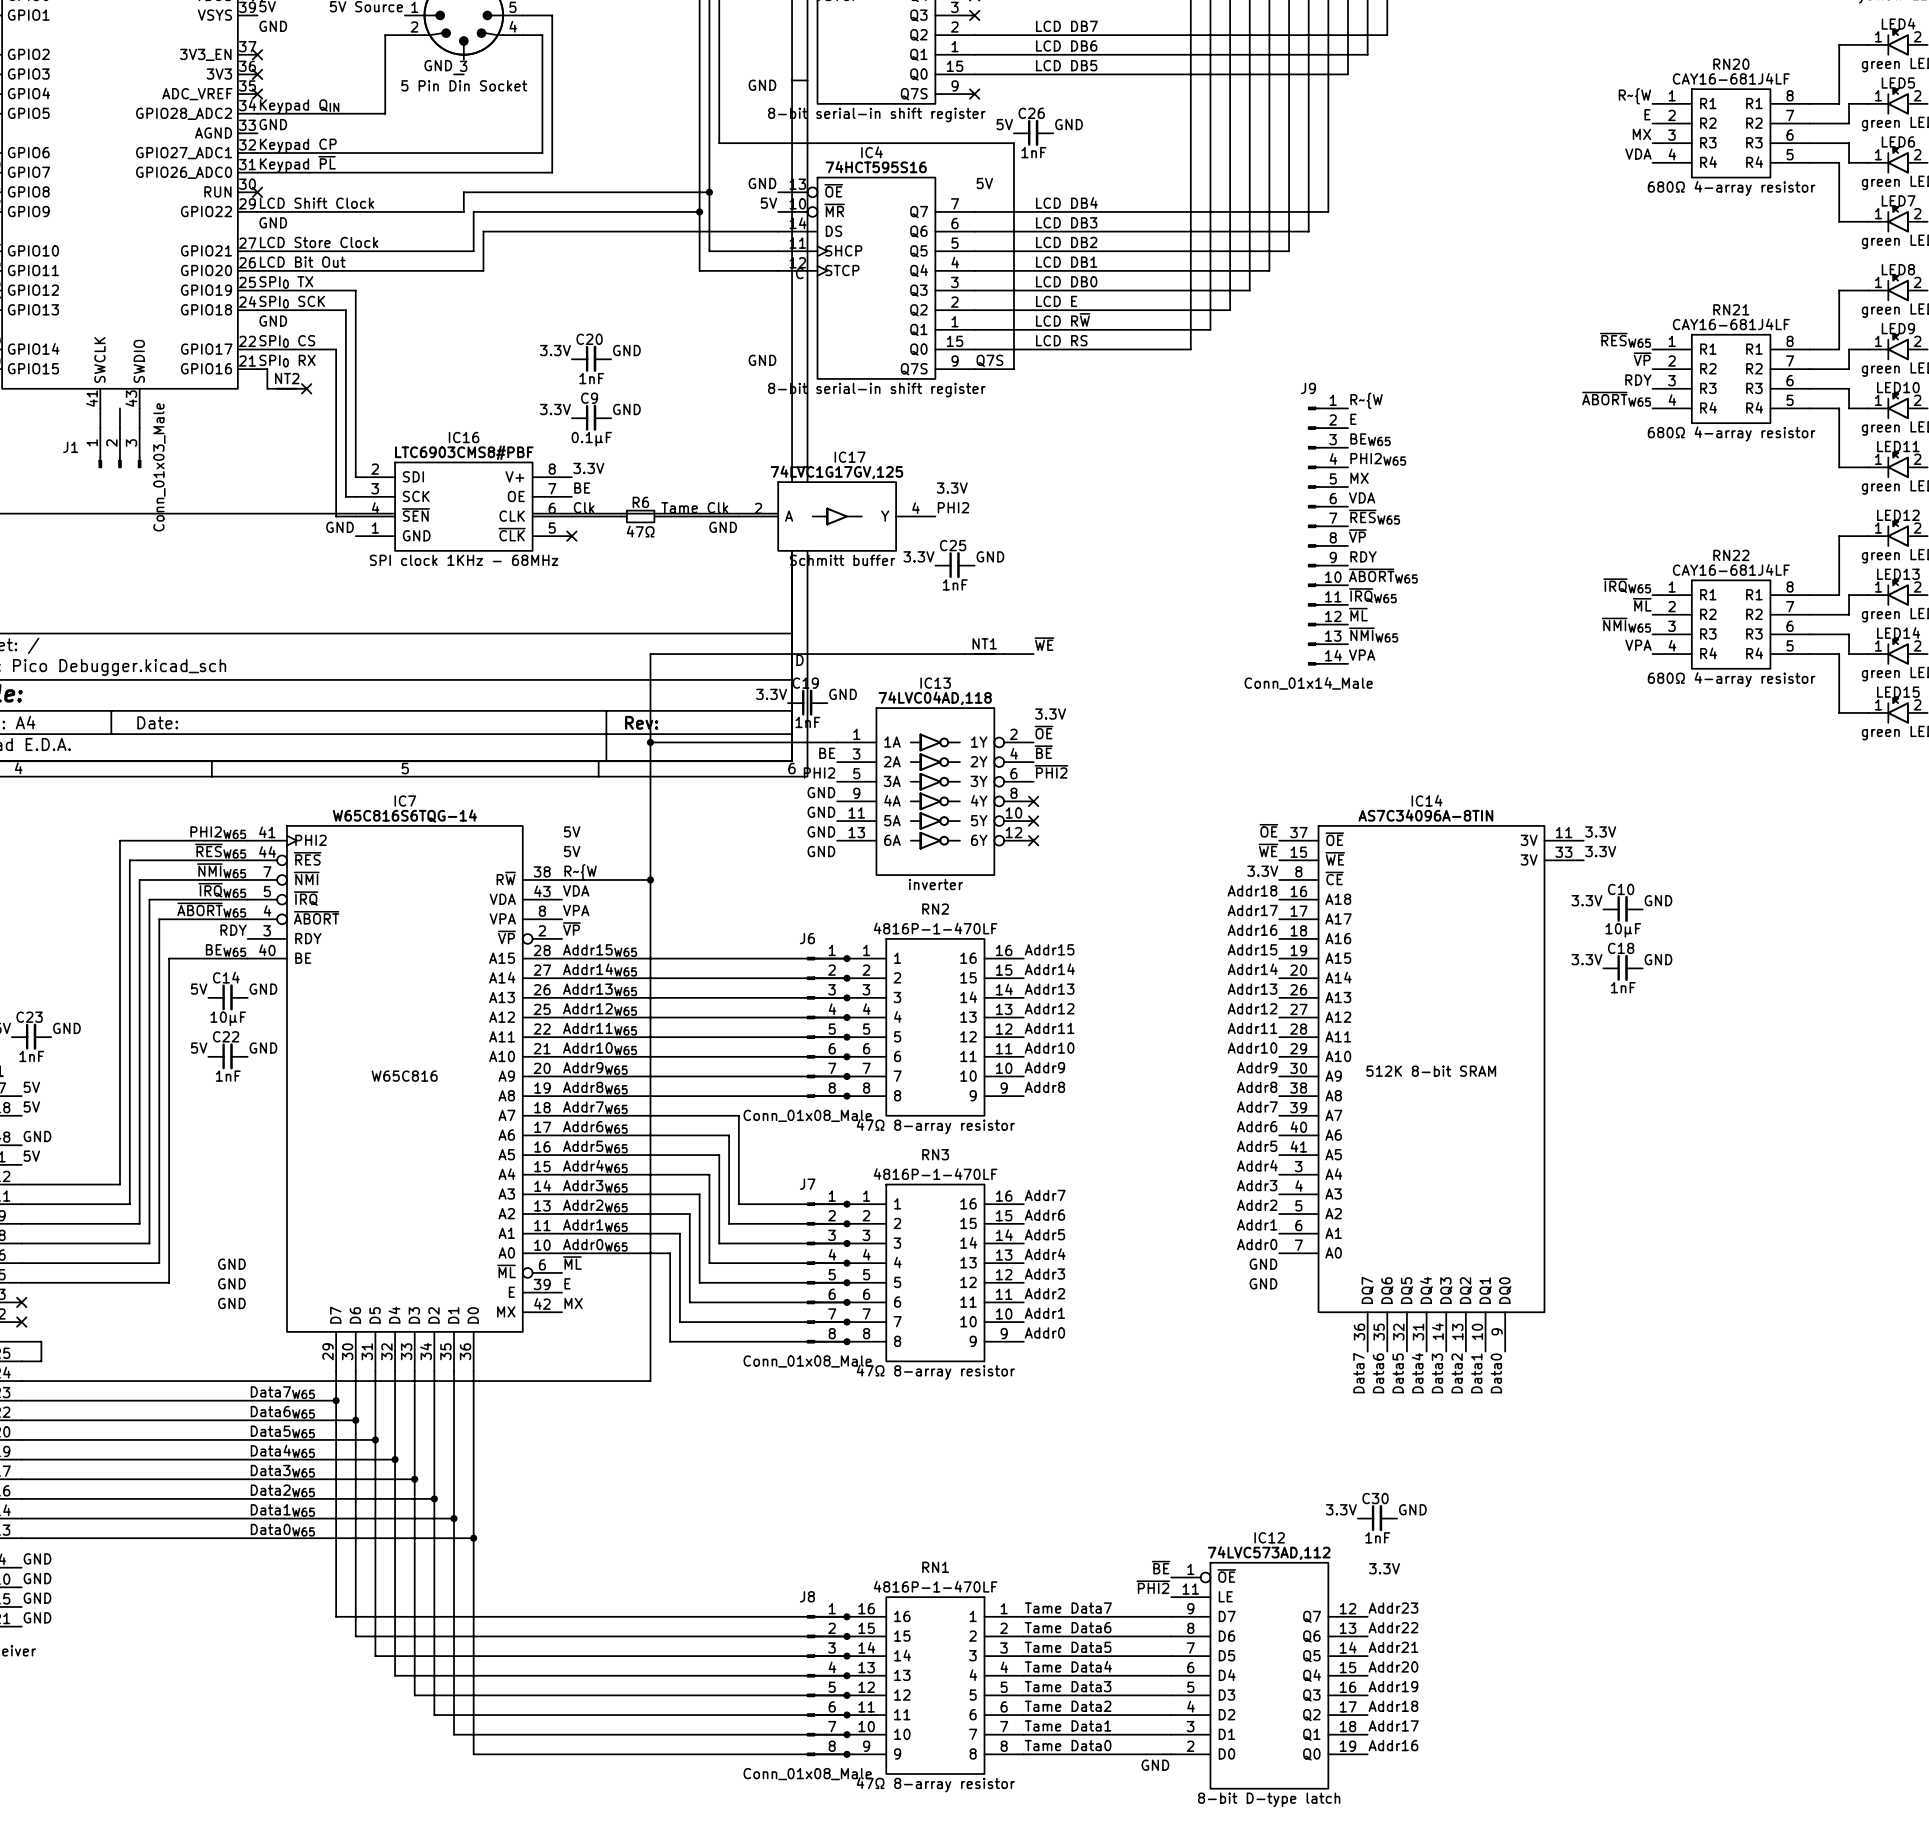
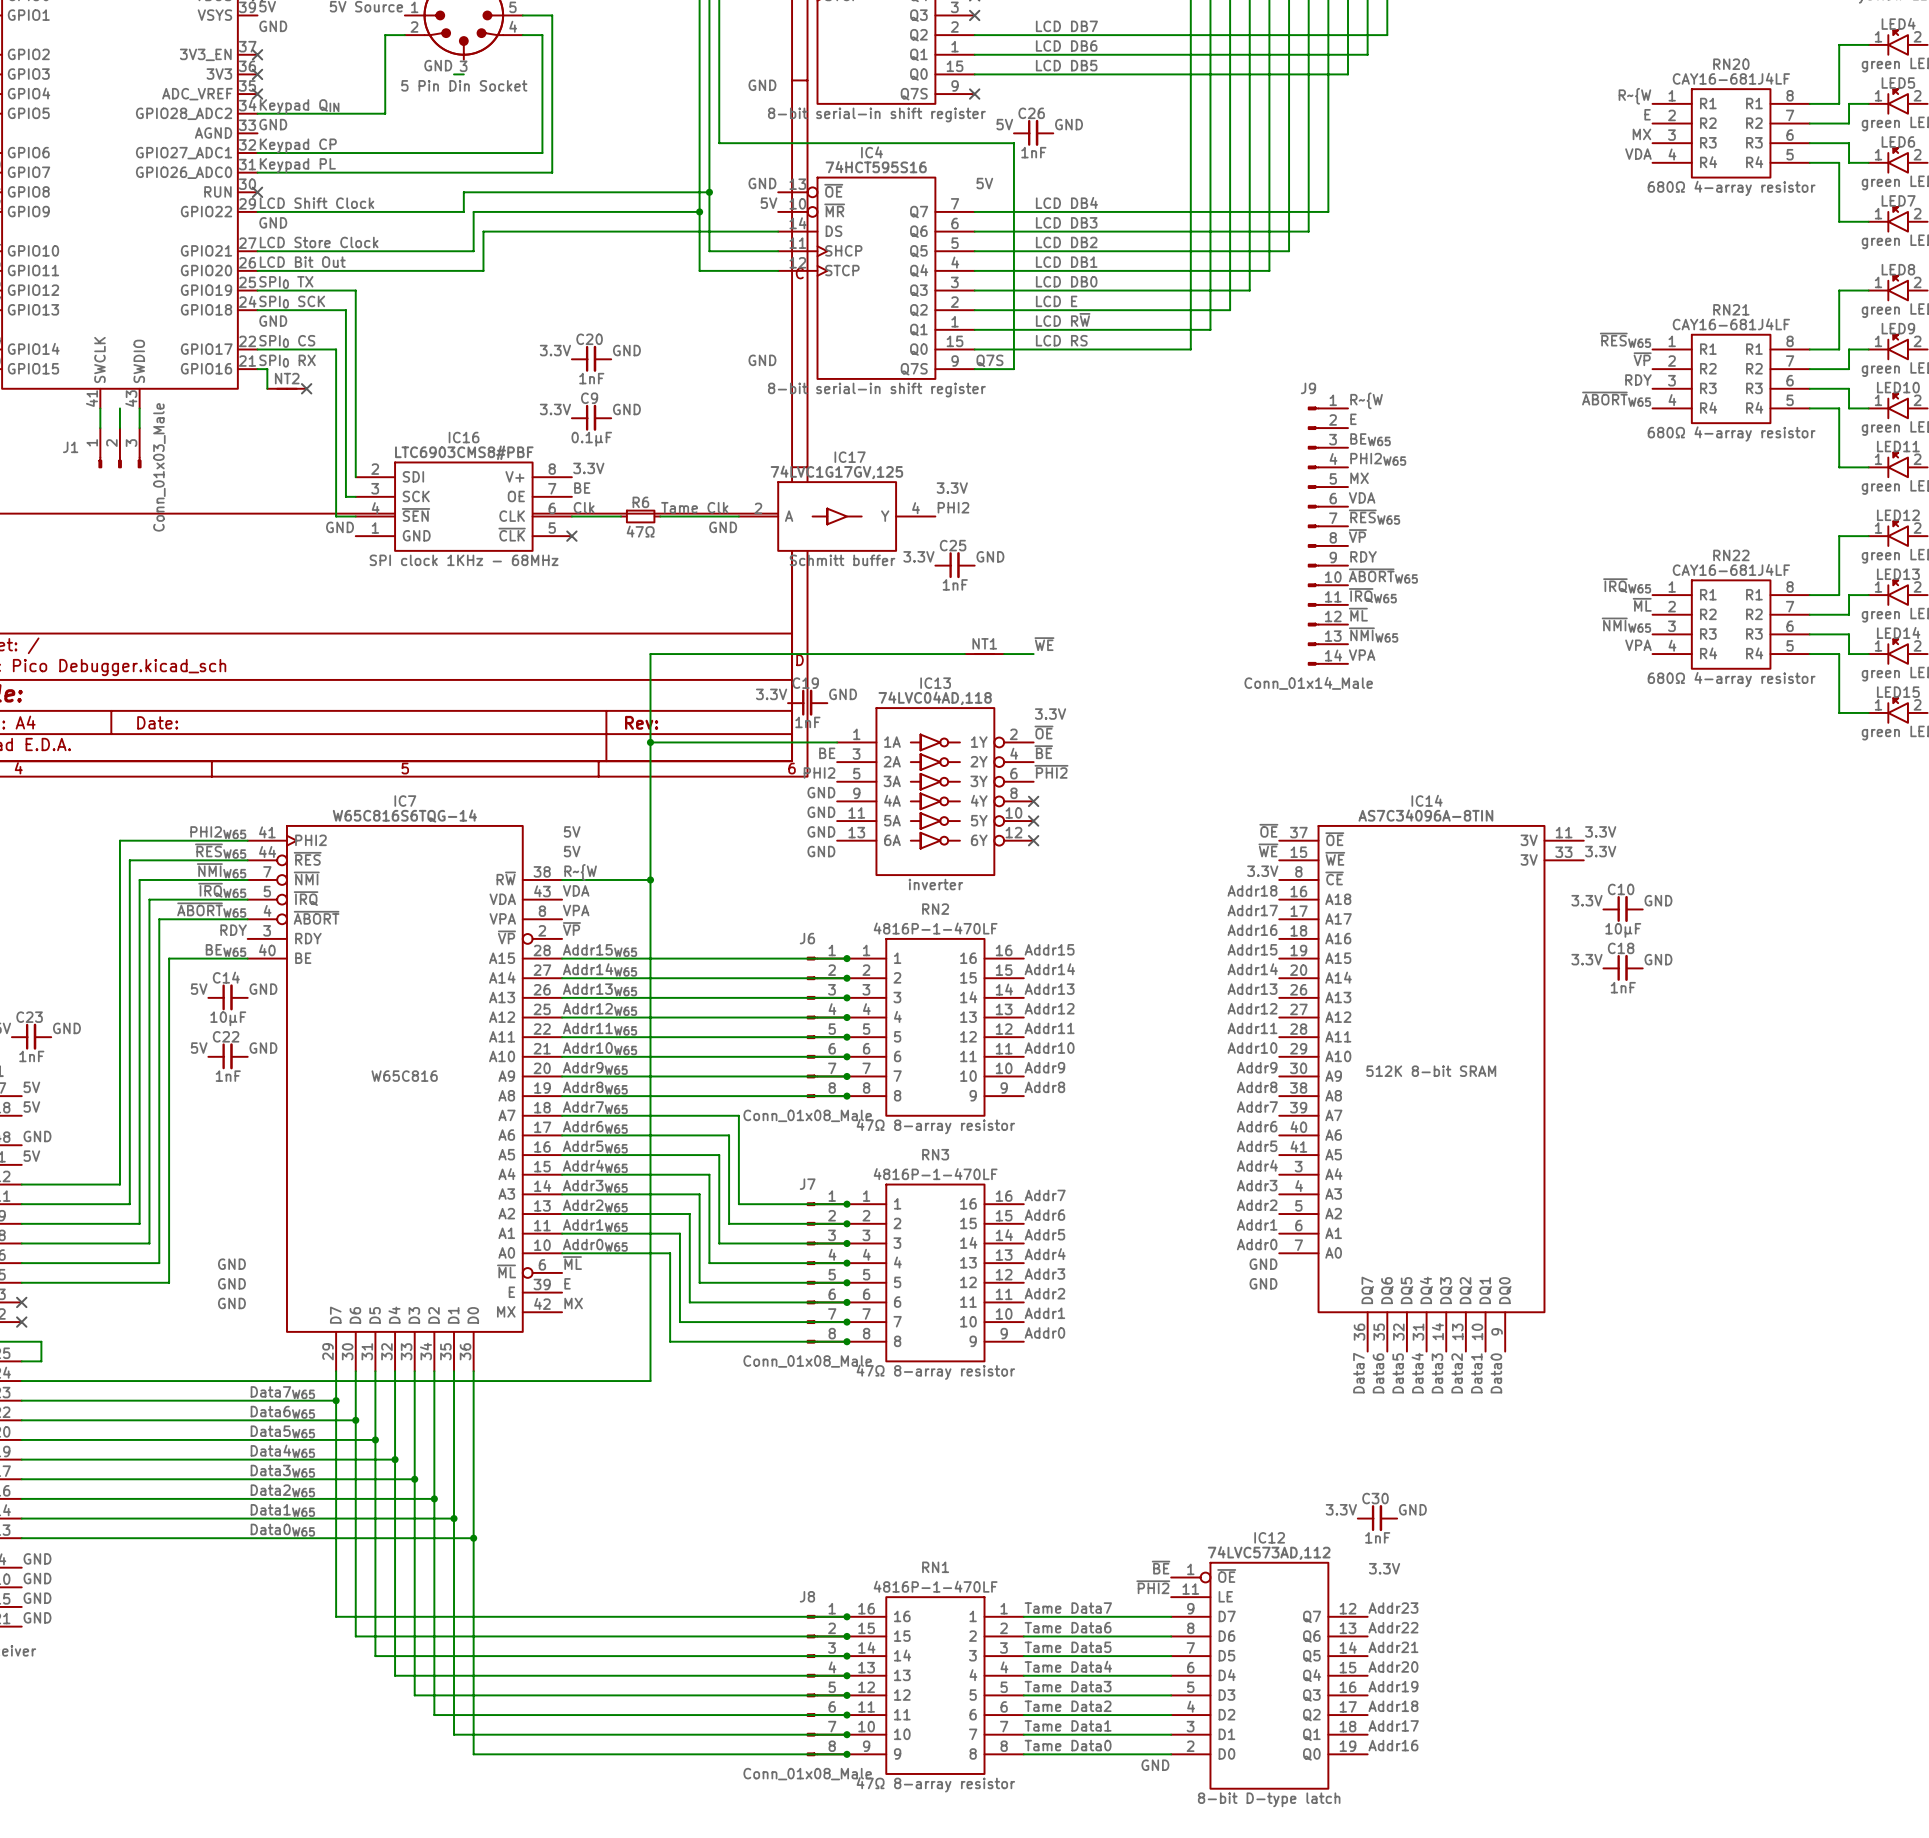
label: Keypad ~{PL} (297, 164) -> Keypad PL (297, 165)

